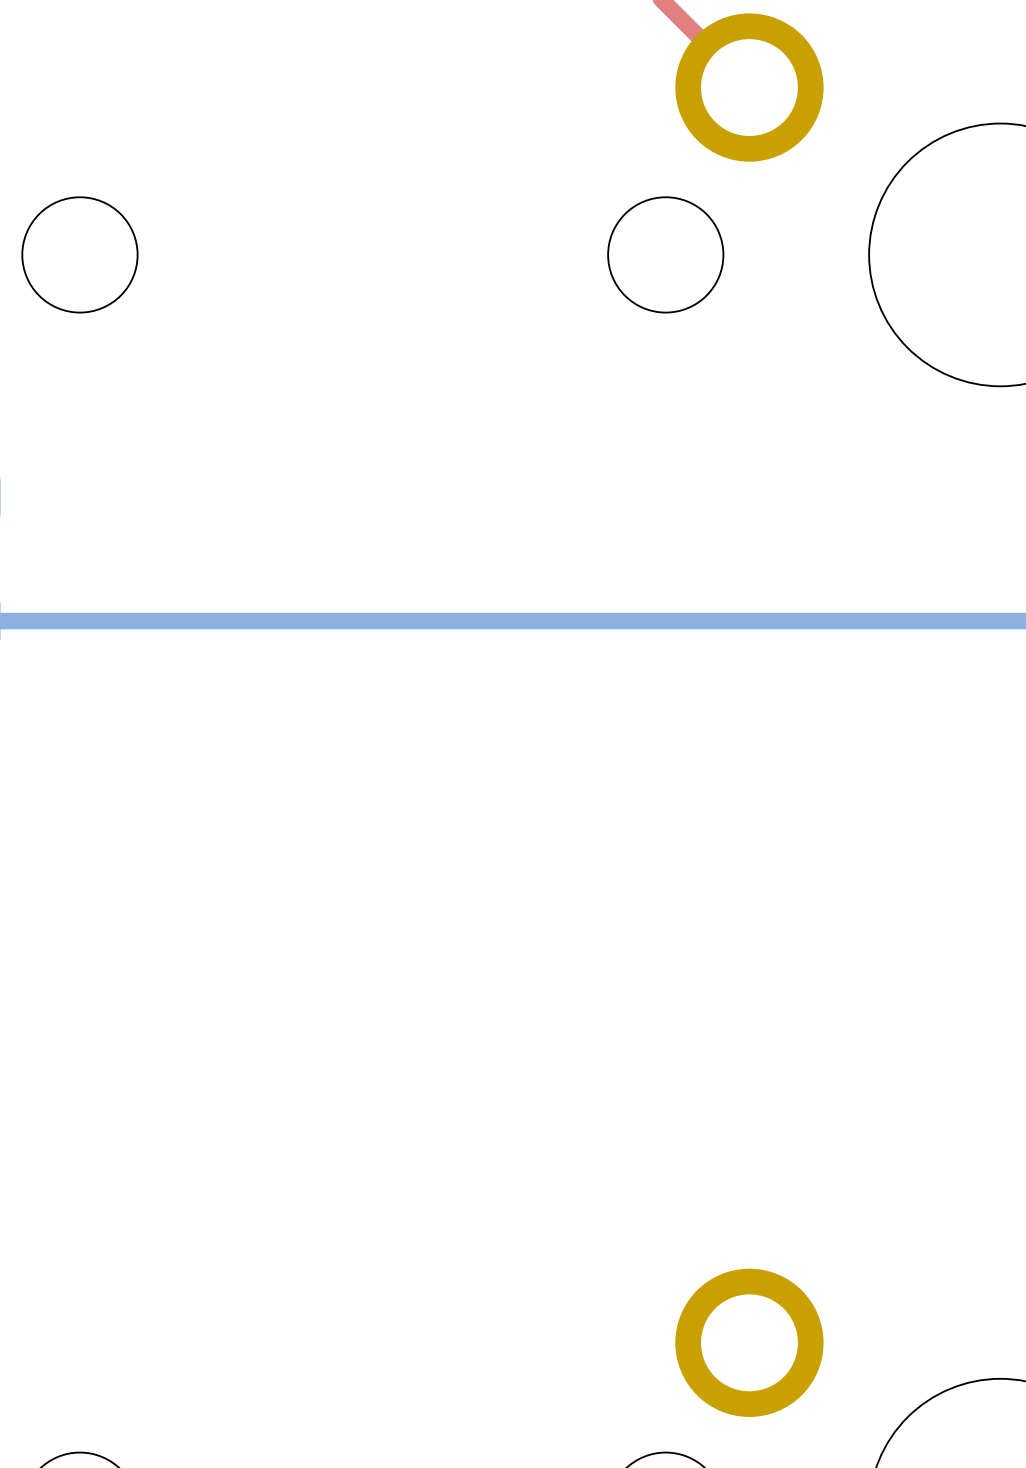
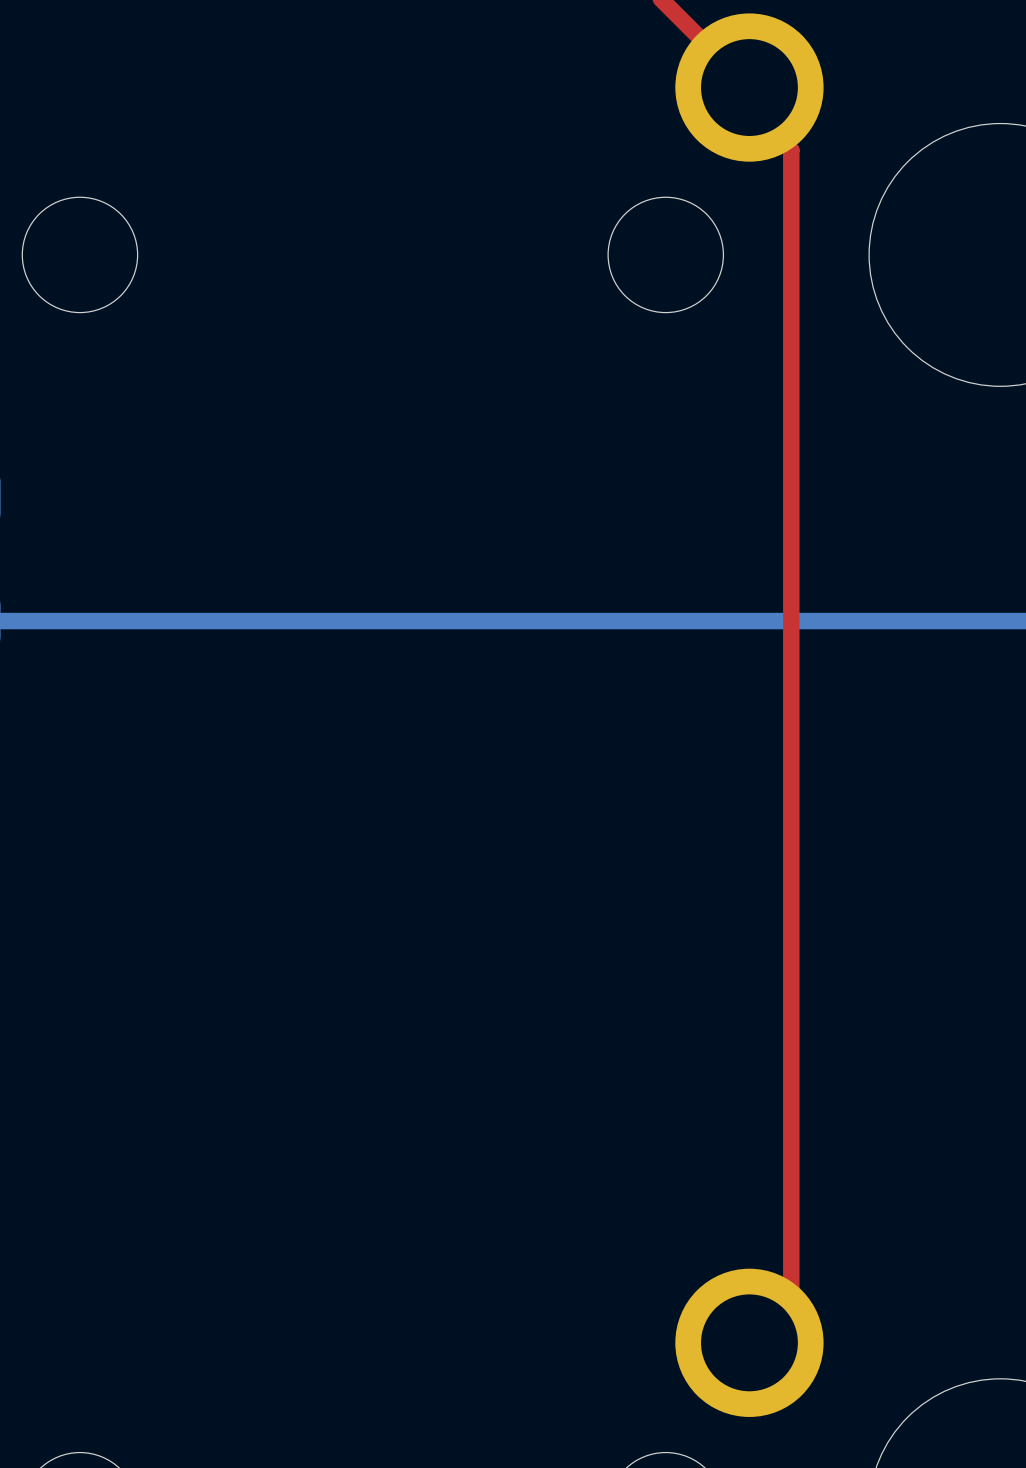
top track: none -> (749, 87) (749, 108) (791, 150) (791, 1300) (749, 1342)

